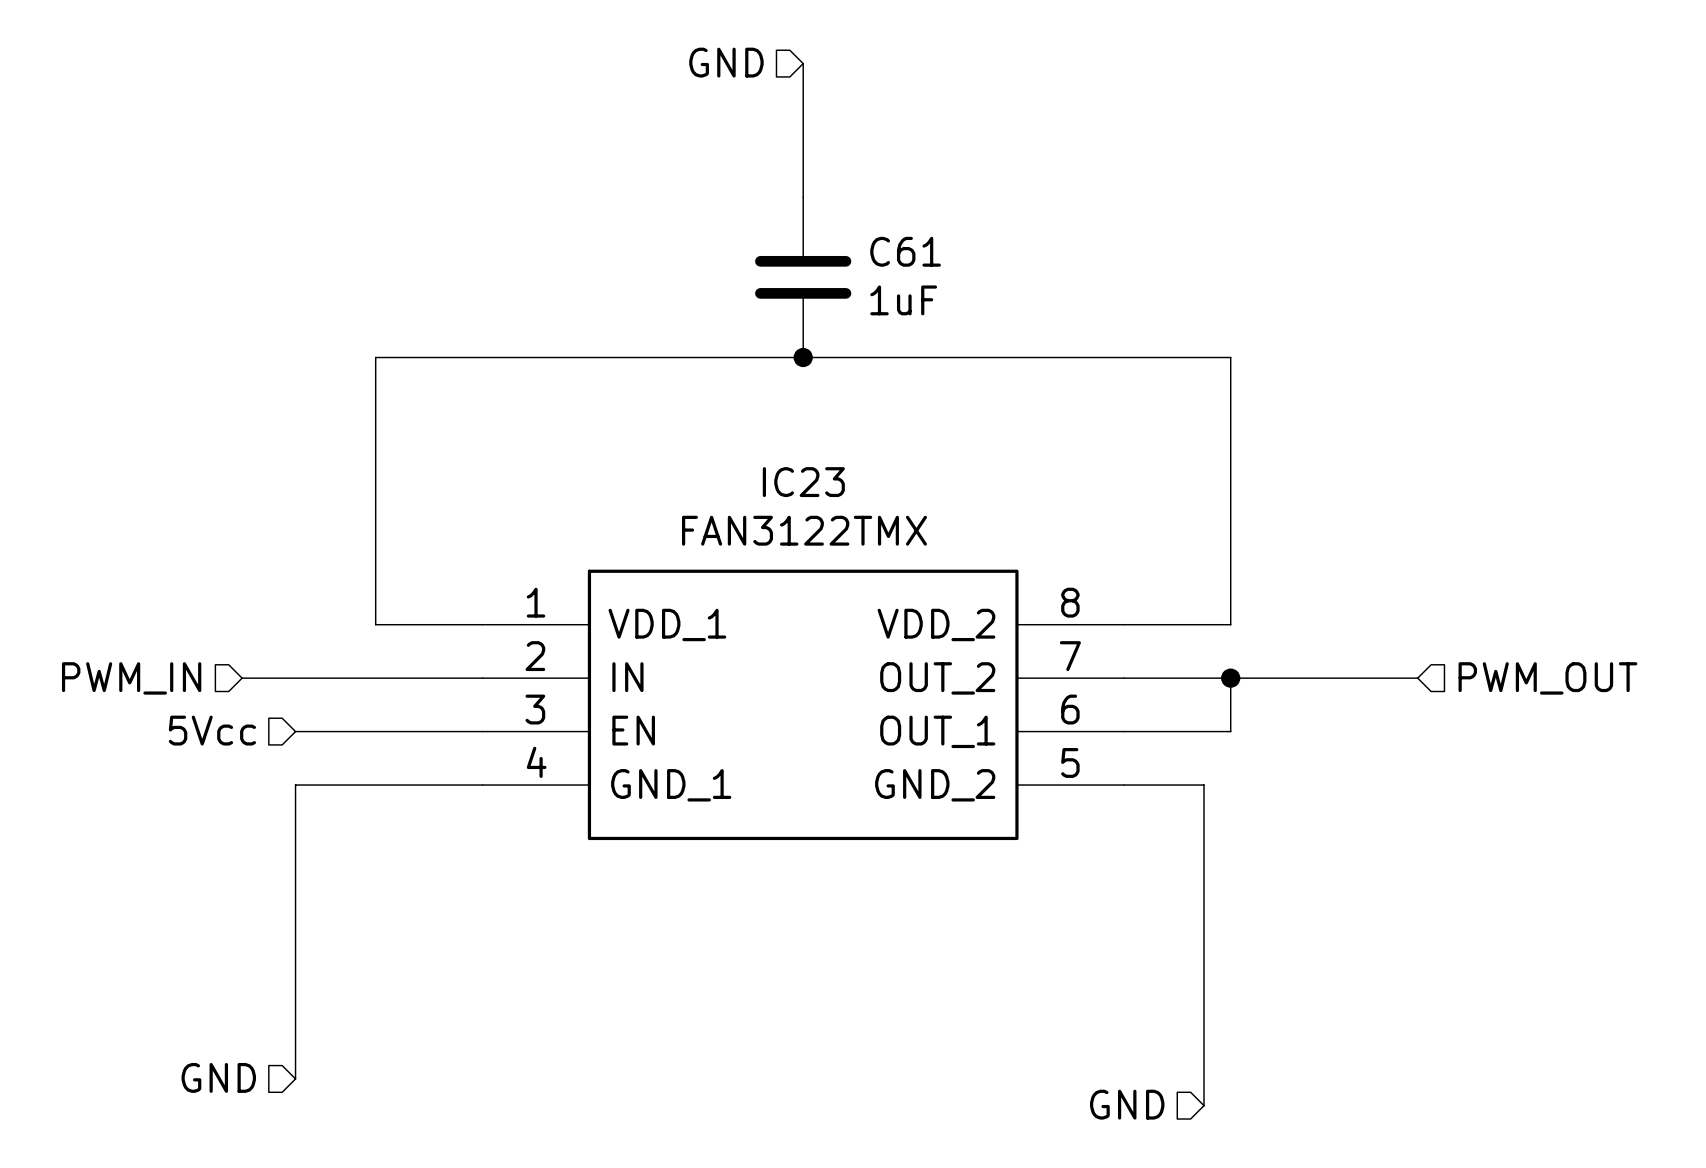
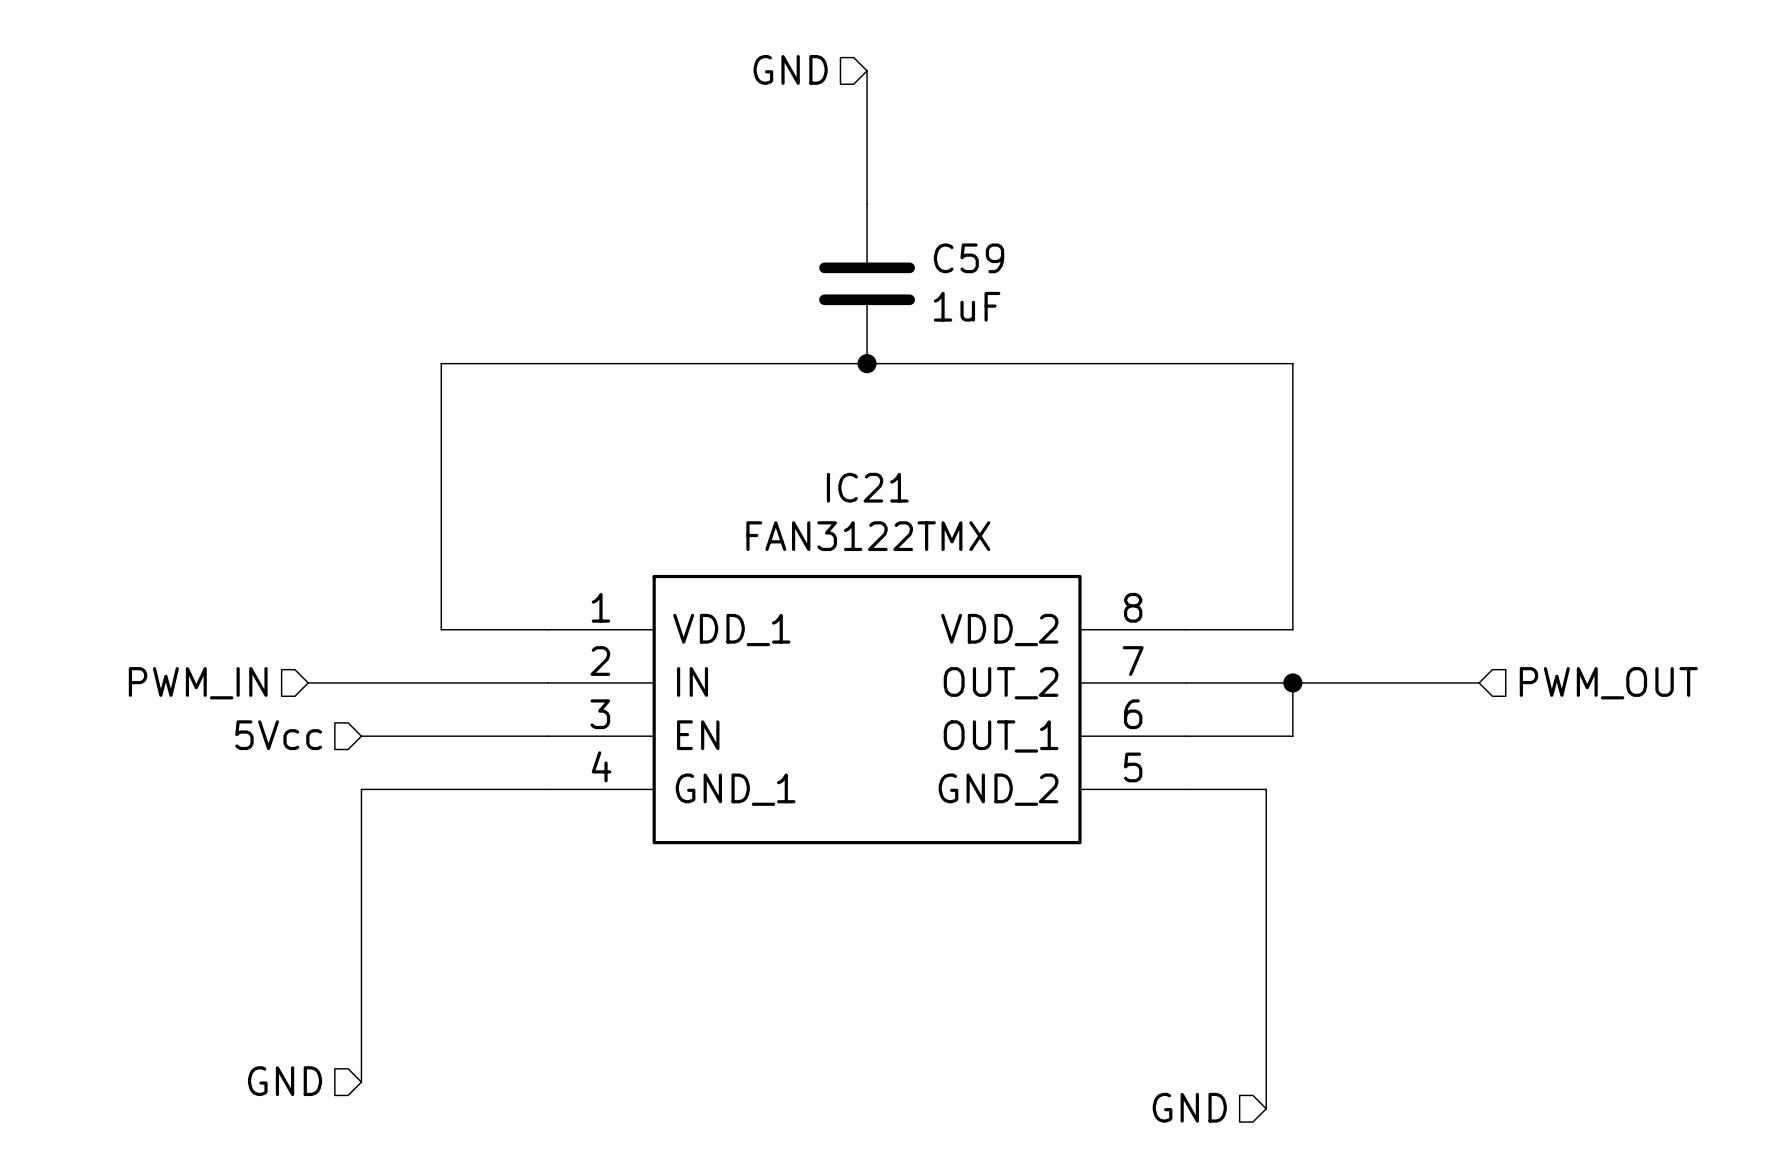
C61 name: C61 (905, 251) -> C59 (969, 258)
IC23 name: IC23 (803, 482) -> IC21 (867, 487)

